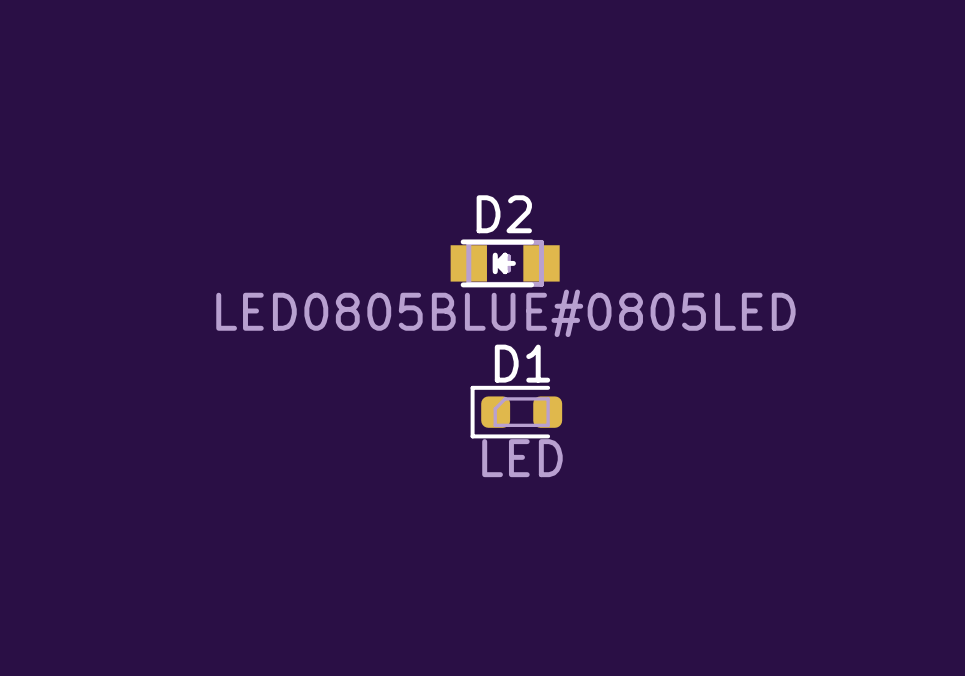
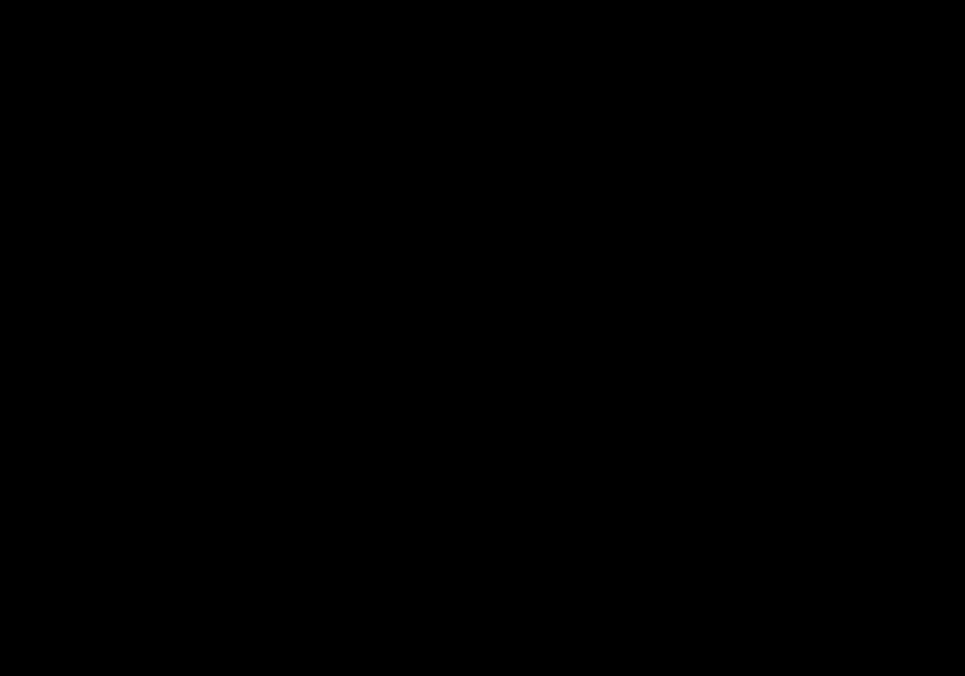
D2: LED0805BLUE#0805LED (505, 263) -> none
D1: LED (516, 412) -> none

